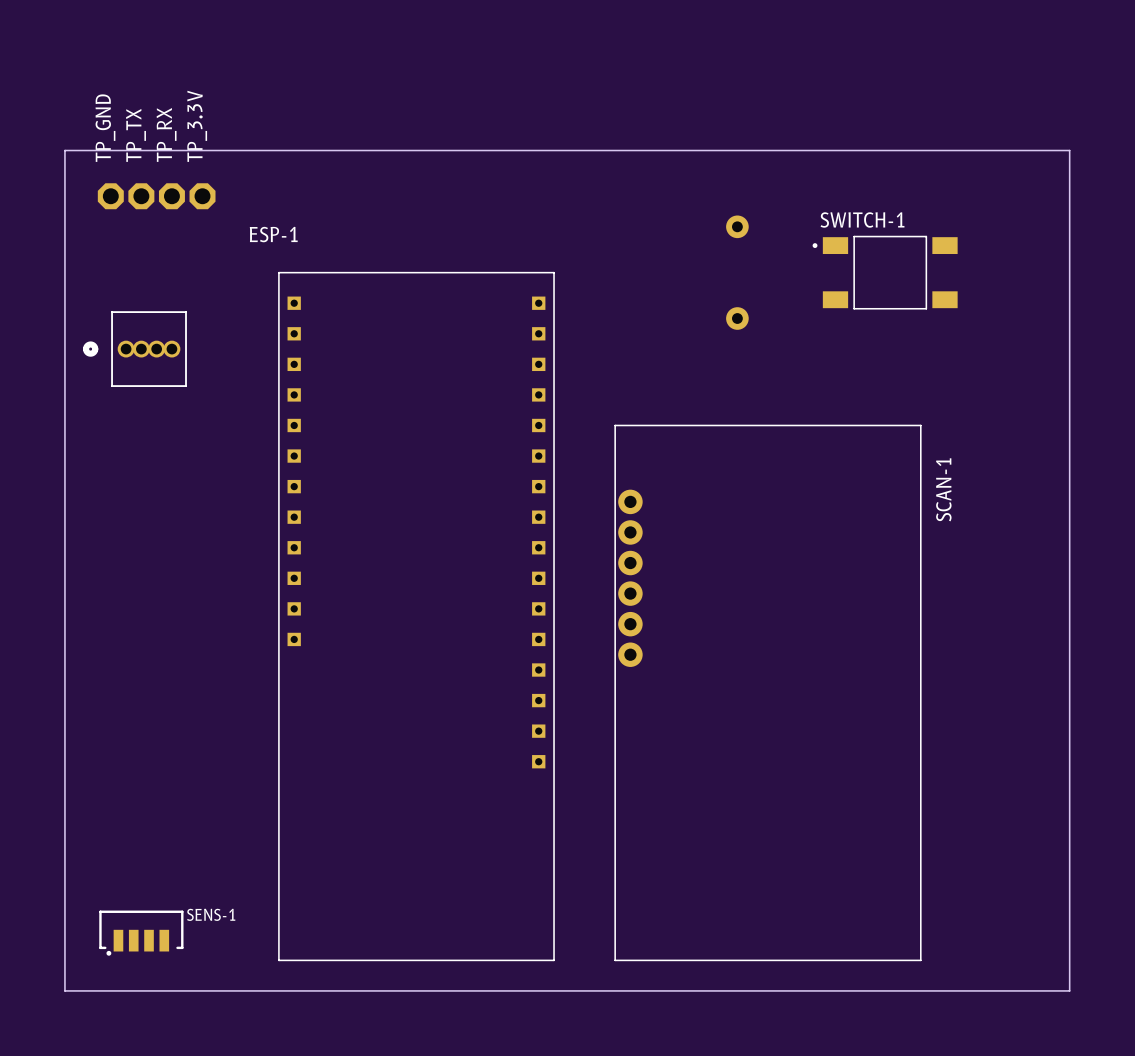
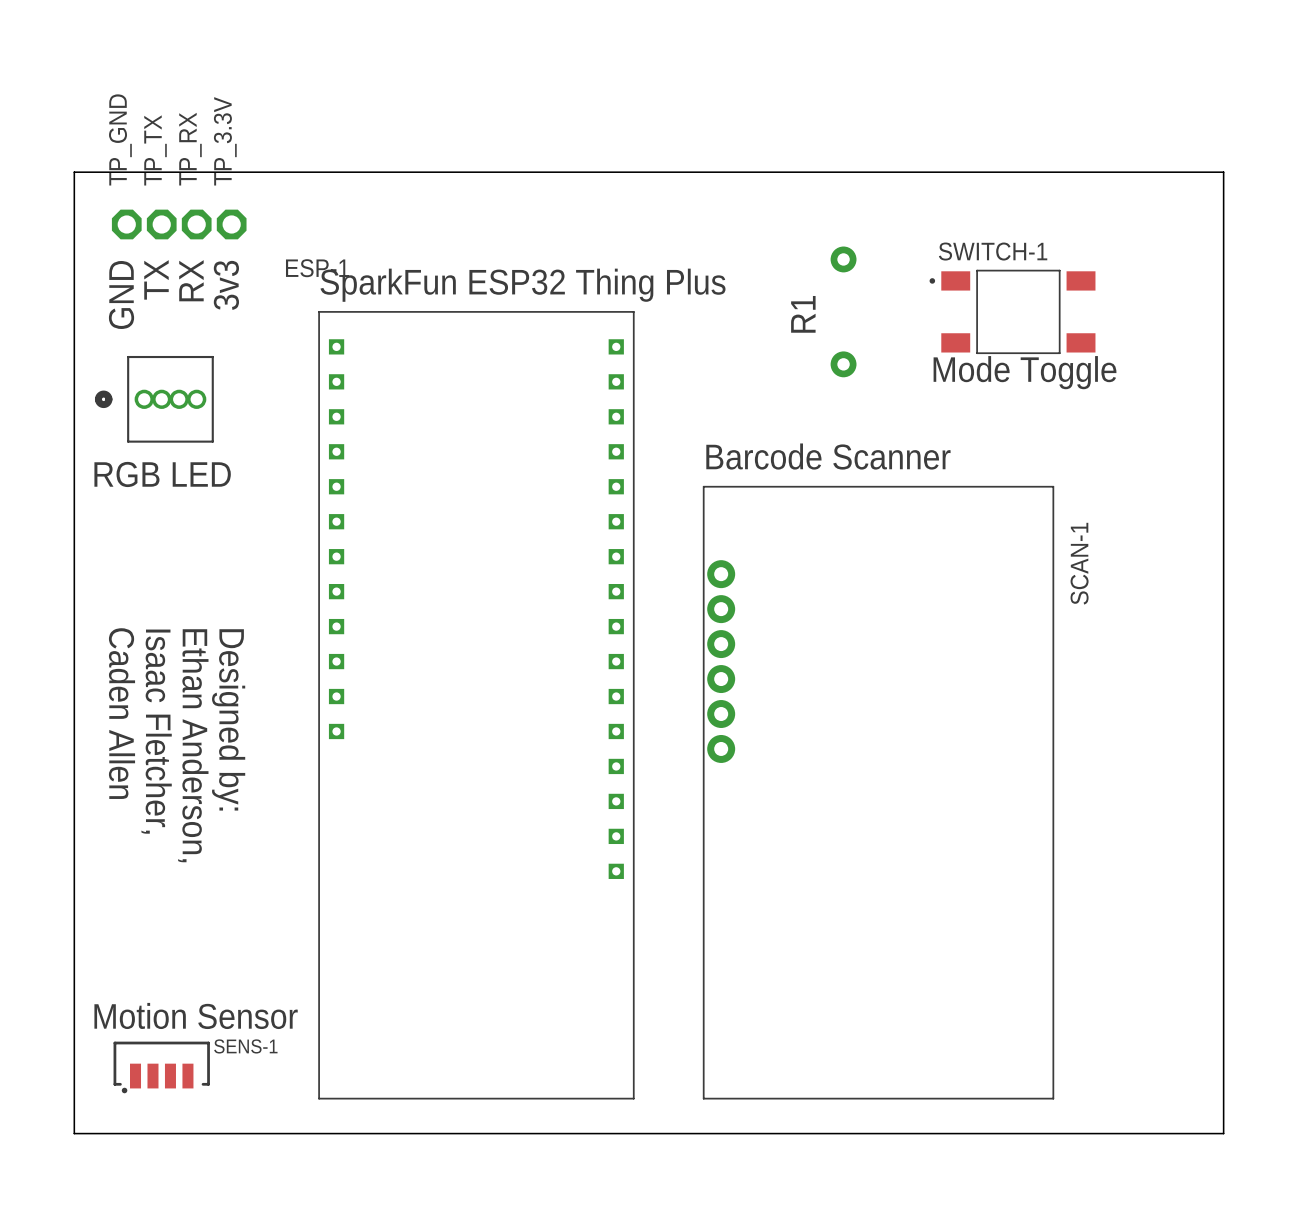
text: none -> TX (156, 279)
text: none -> RX (191, 280)
text: none -> SparkFun ESP32 Thing Plus (523, 285)
text: none -> 3v3 (226, 285)
text: none -> GND (121, 294)
text: none -> R1 (803, 314)
text: none -> Mode Toggle (1025, 372)
text: none -> Barcode Scanner (828, 456)
text: none -> RGB LED (162, 474)
text: none -> Caden Allen (121, 713)
text: none -> Designed by: (228, 719)
text: none -> Isaac Fletcher, (156, 731)
text: none -> Ethan Anderson, (193, 745)
text: none -> Motion Sensor (196, 1015)

